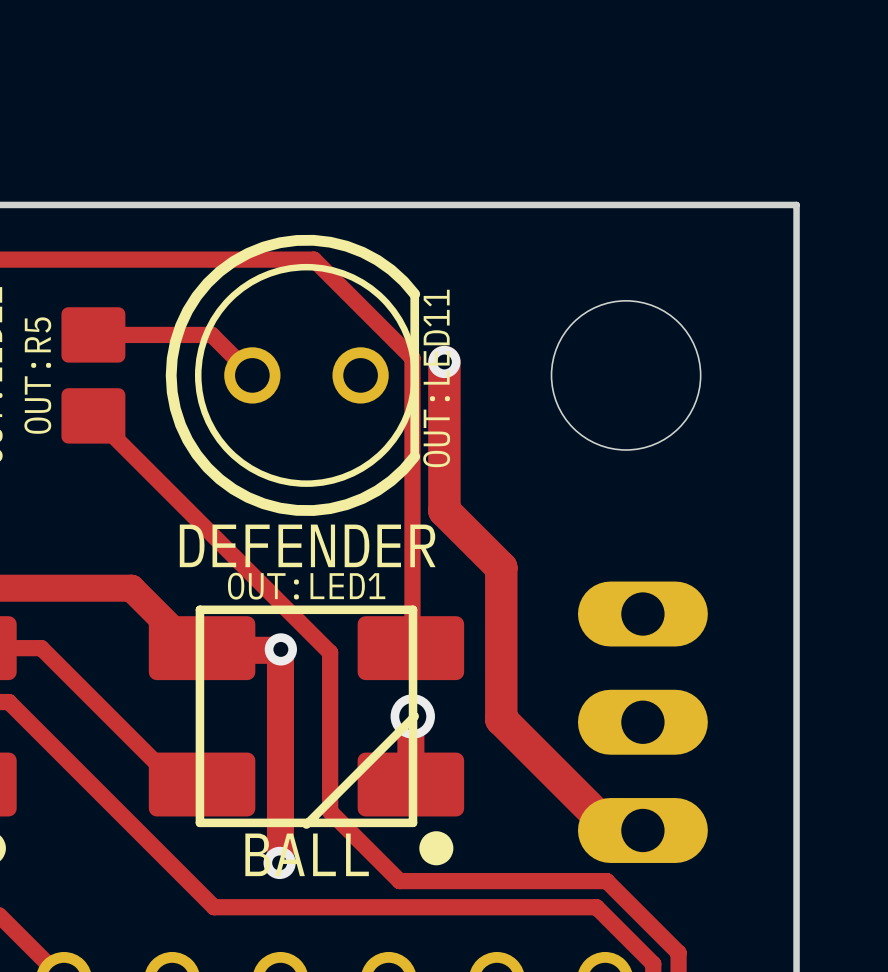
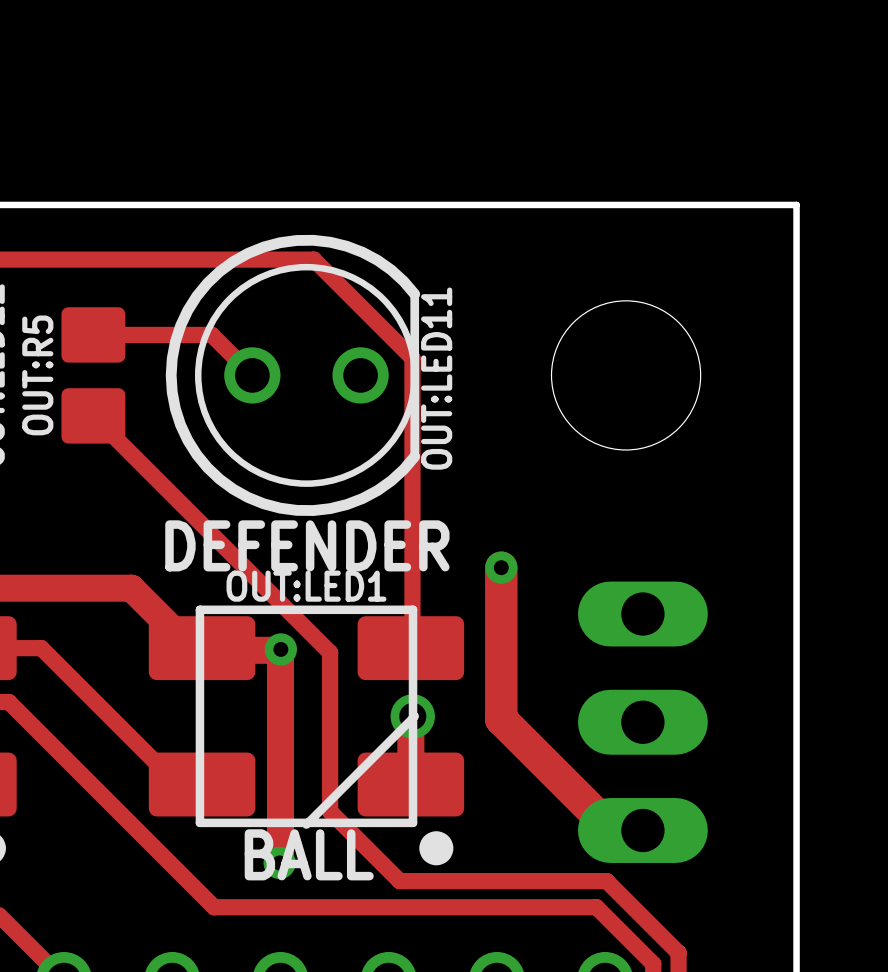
track: (444, 361) (444, 510) (501, 567) -> none
via position: (444, 361) -> (501, 567)

